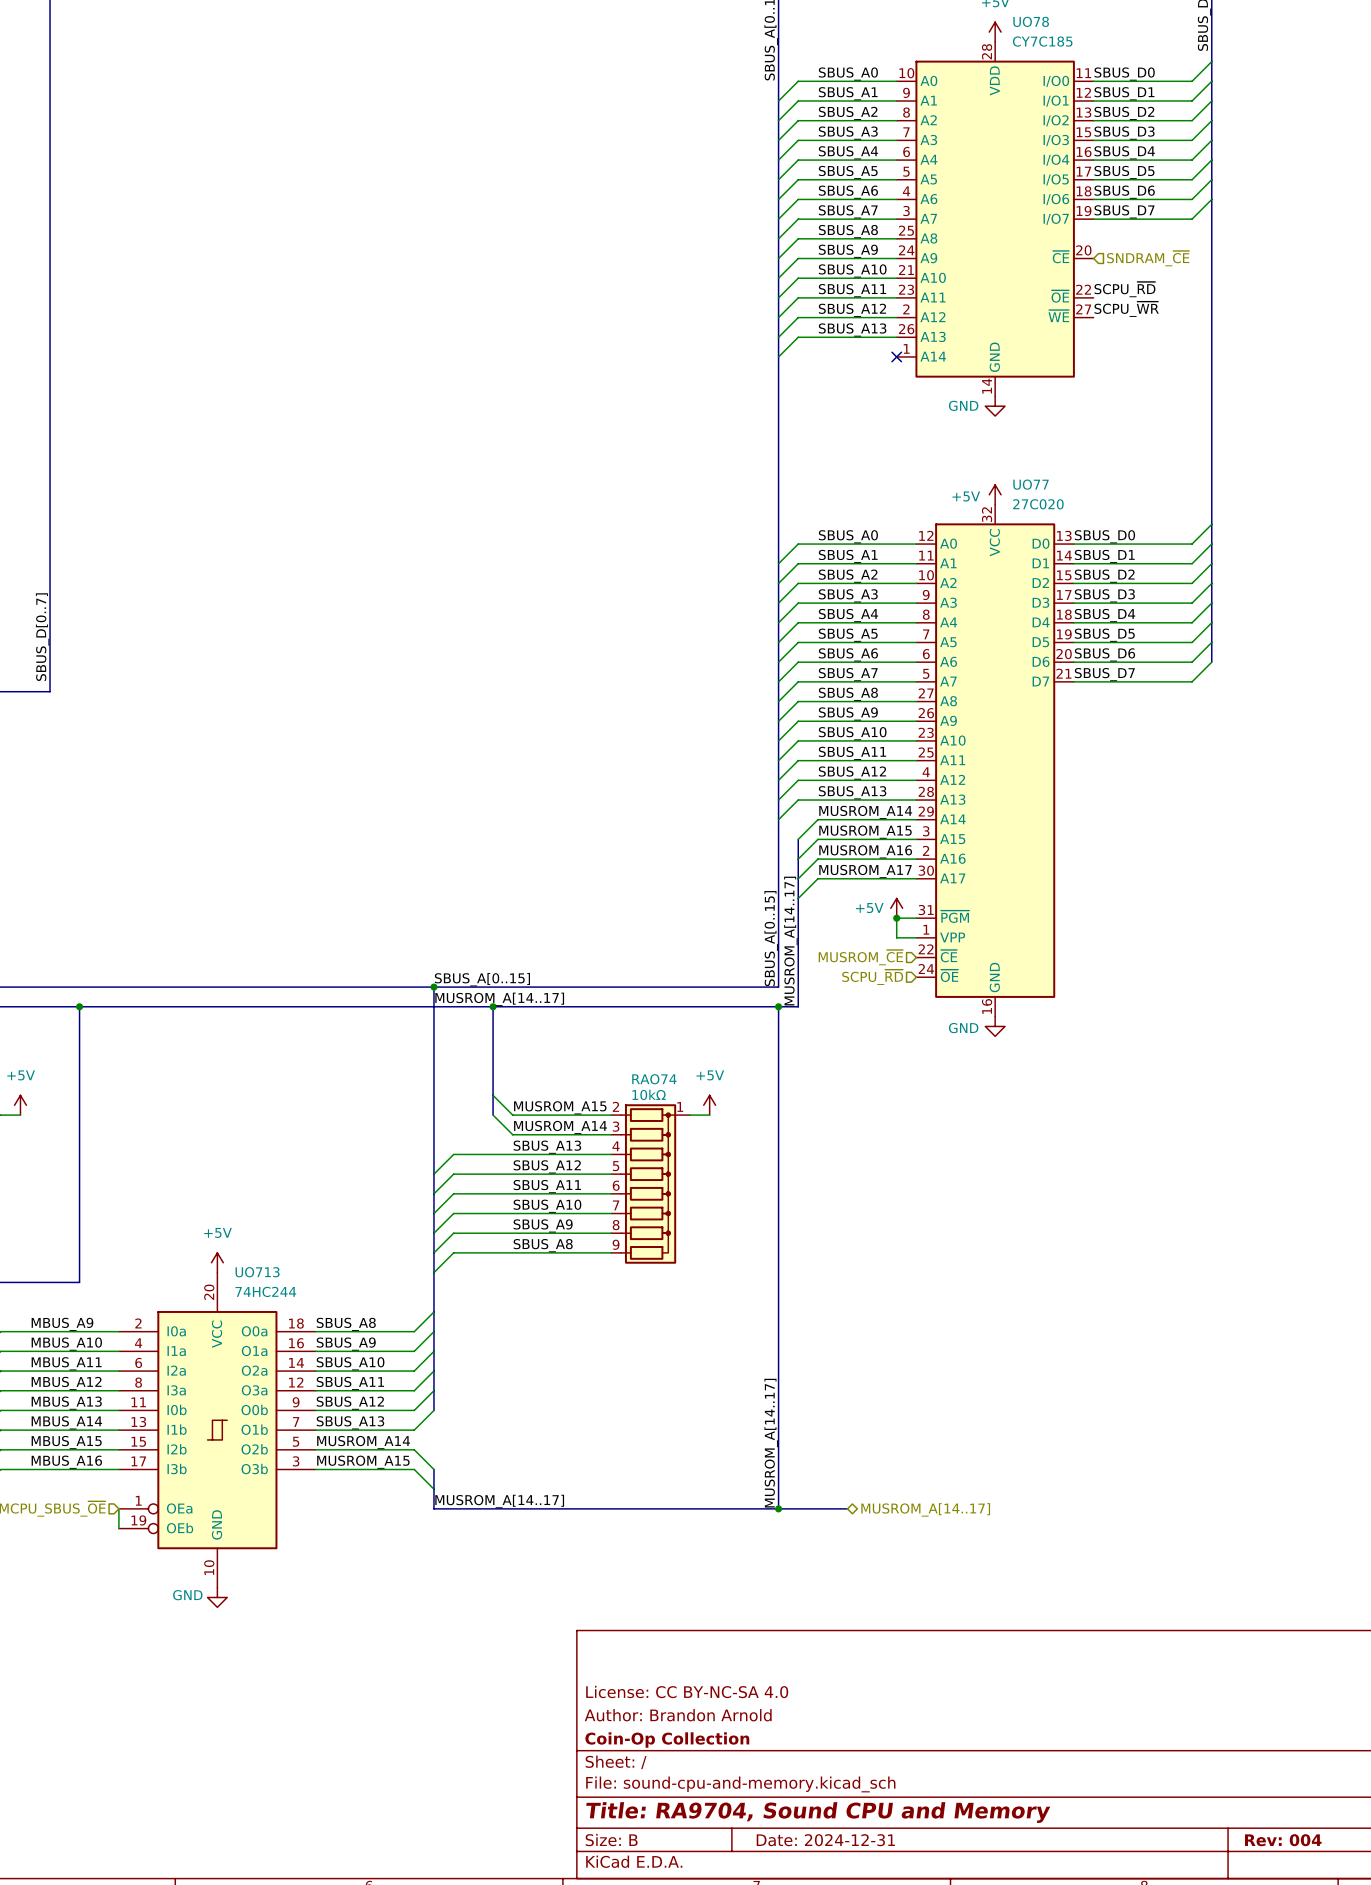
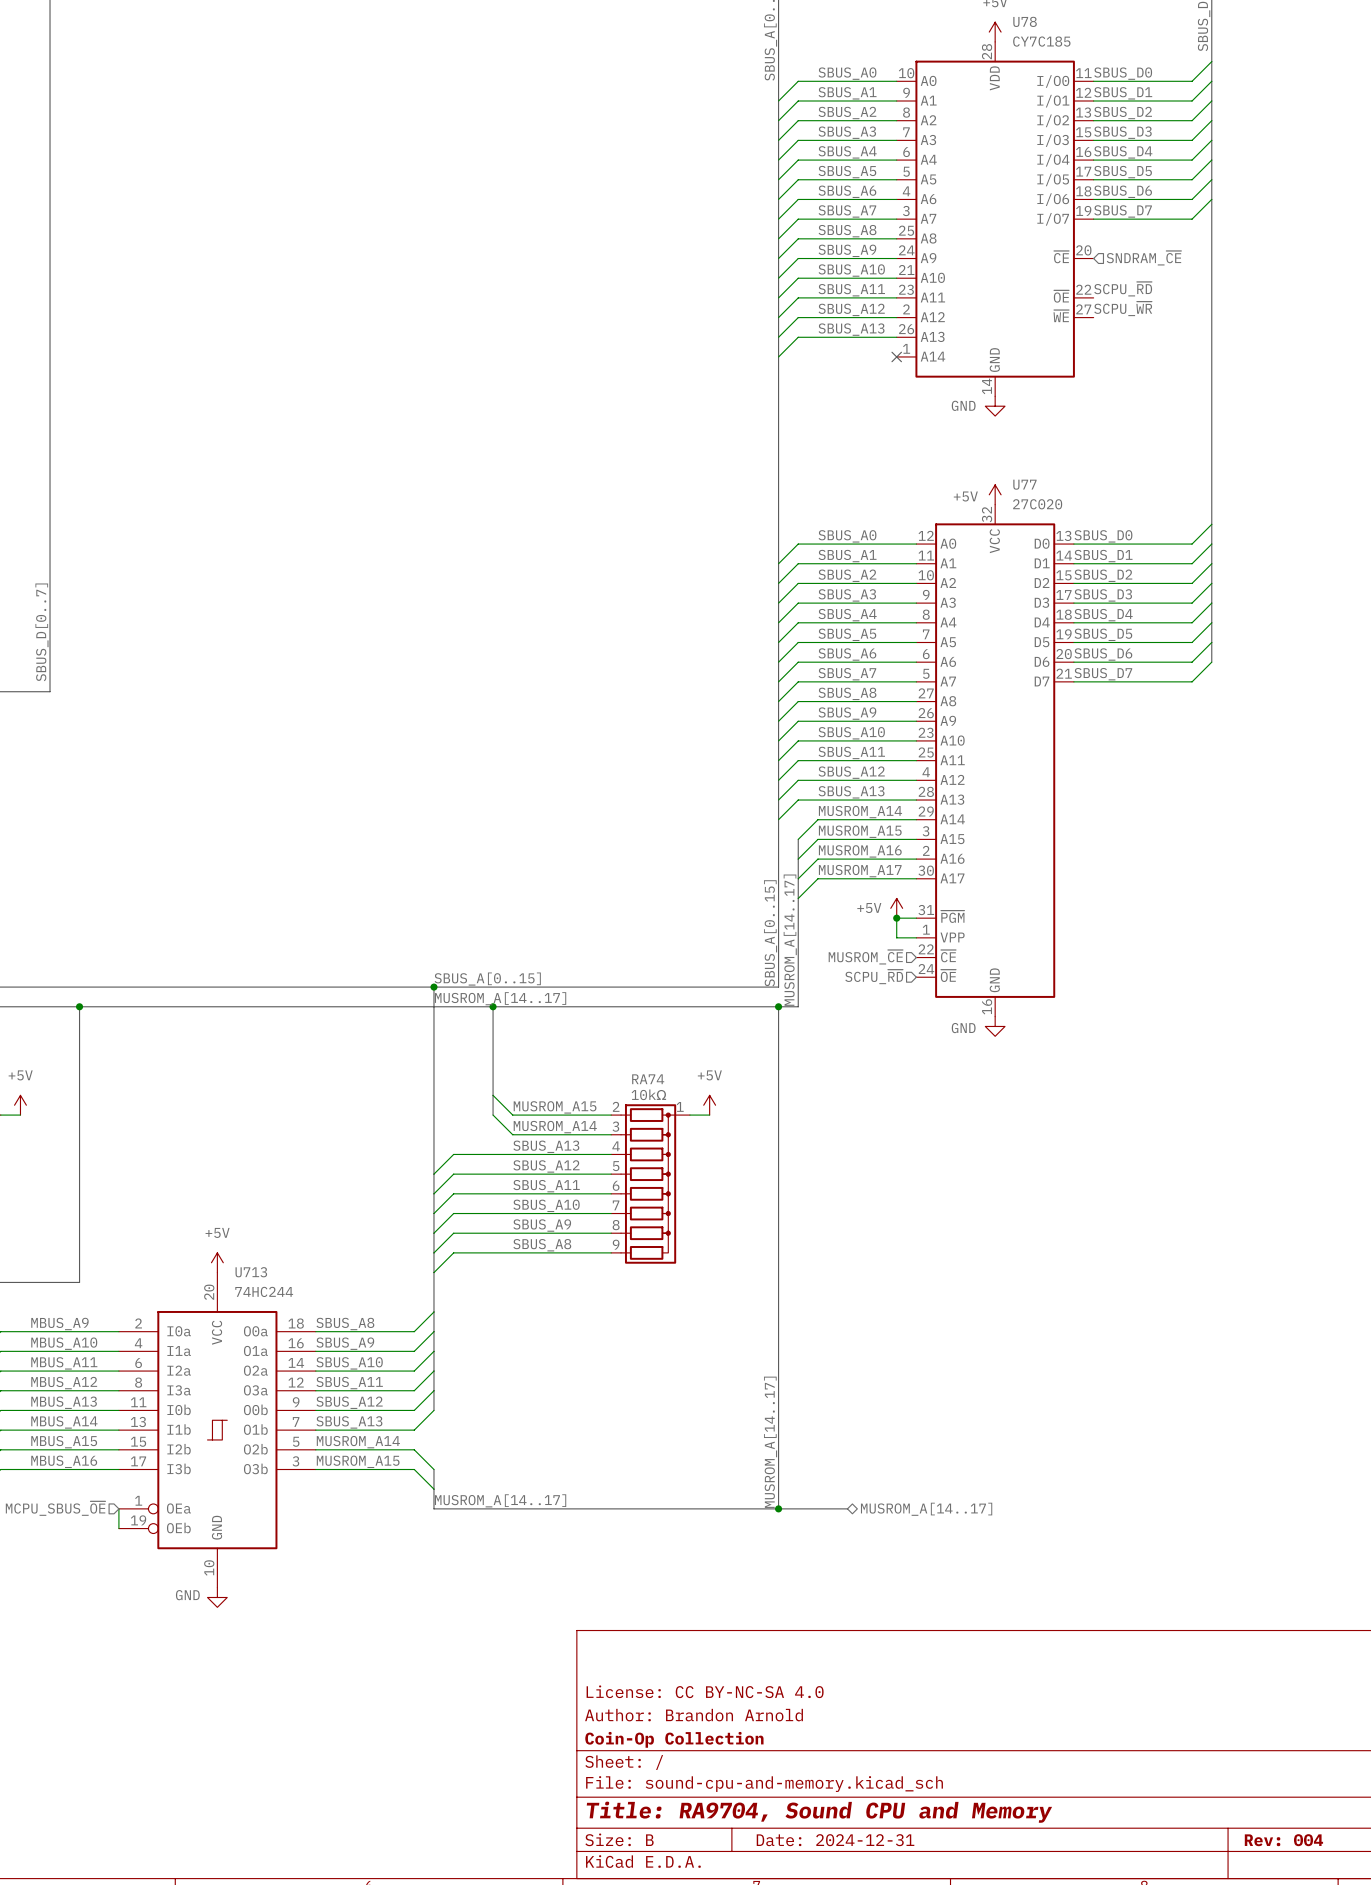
UO78 name: UO78 (1031, 21) -> U78 (1025, 21)
UO77 name: UO77 (1031, 484) -> U77 (1024, 484)
RAO74 name: RAO74 (654, 1079) -> RA74 (648, 1079)
UO713 name: UO713 (257, 1272) -> U713 (251, 1272)

